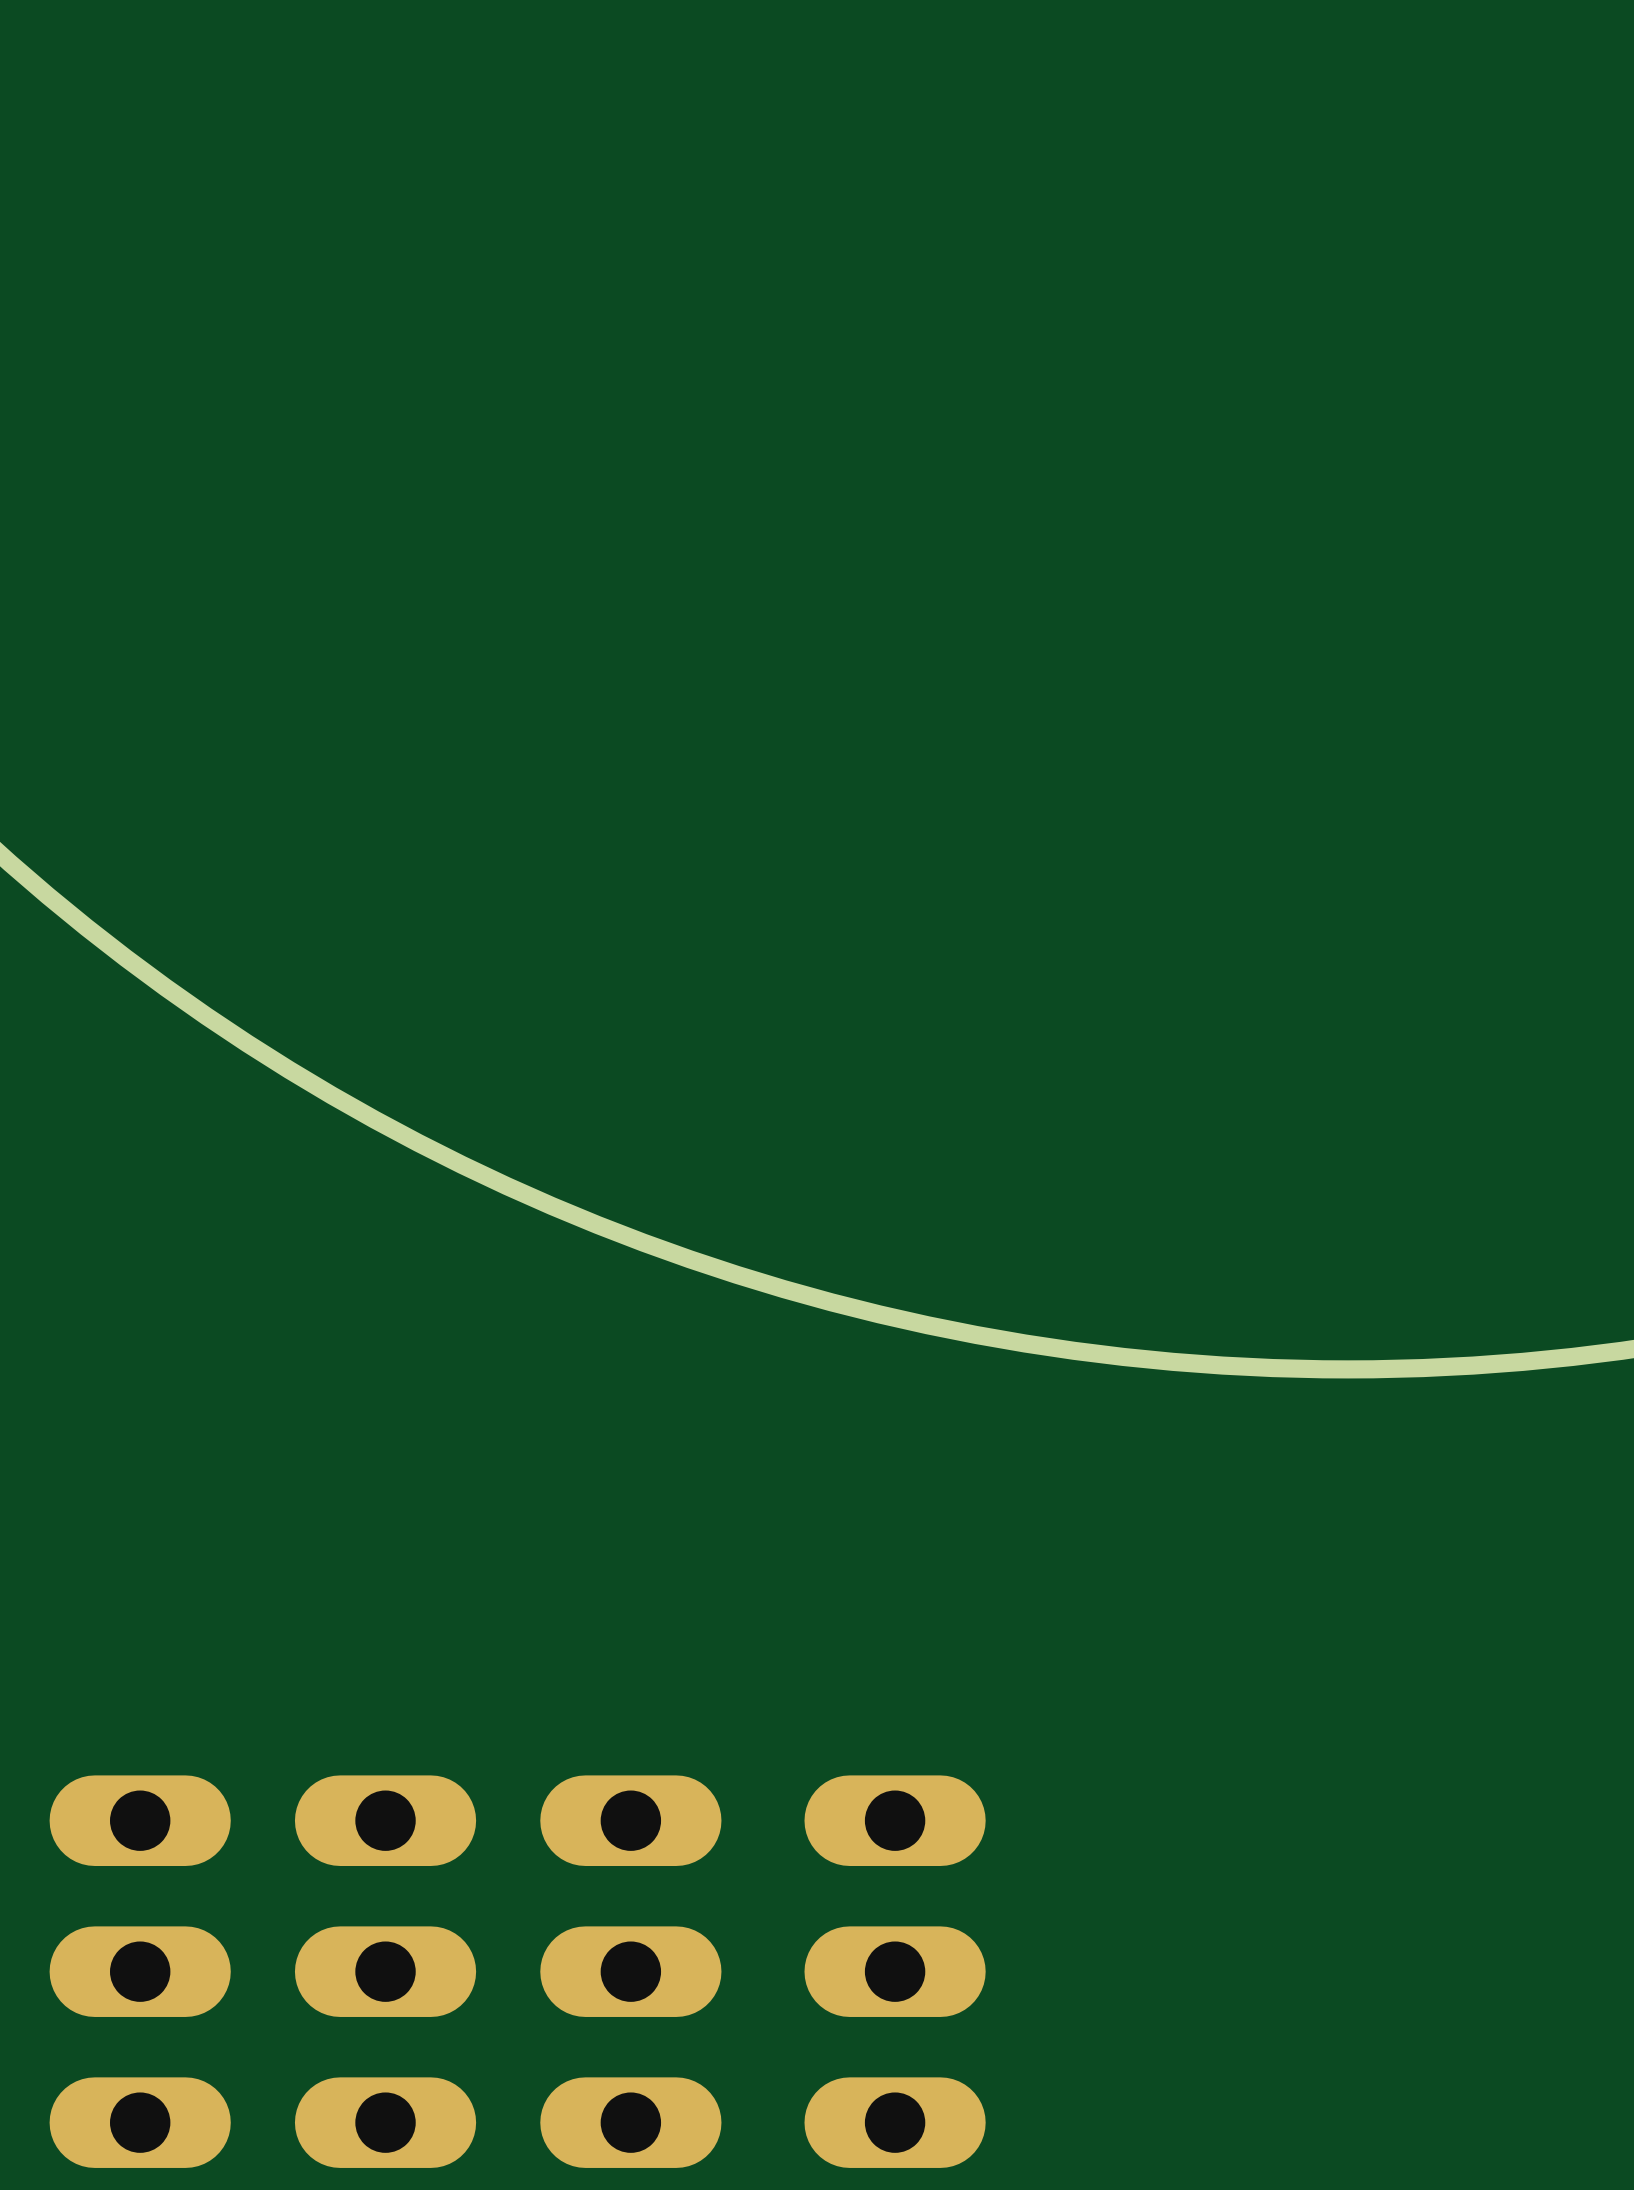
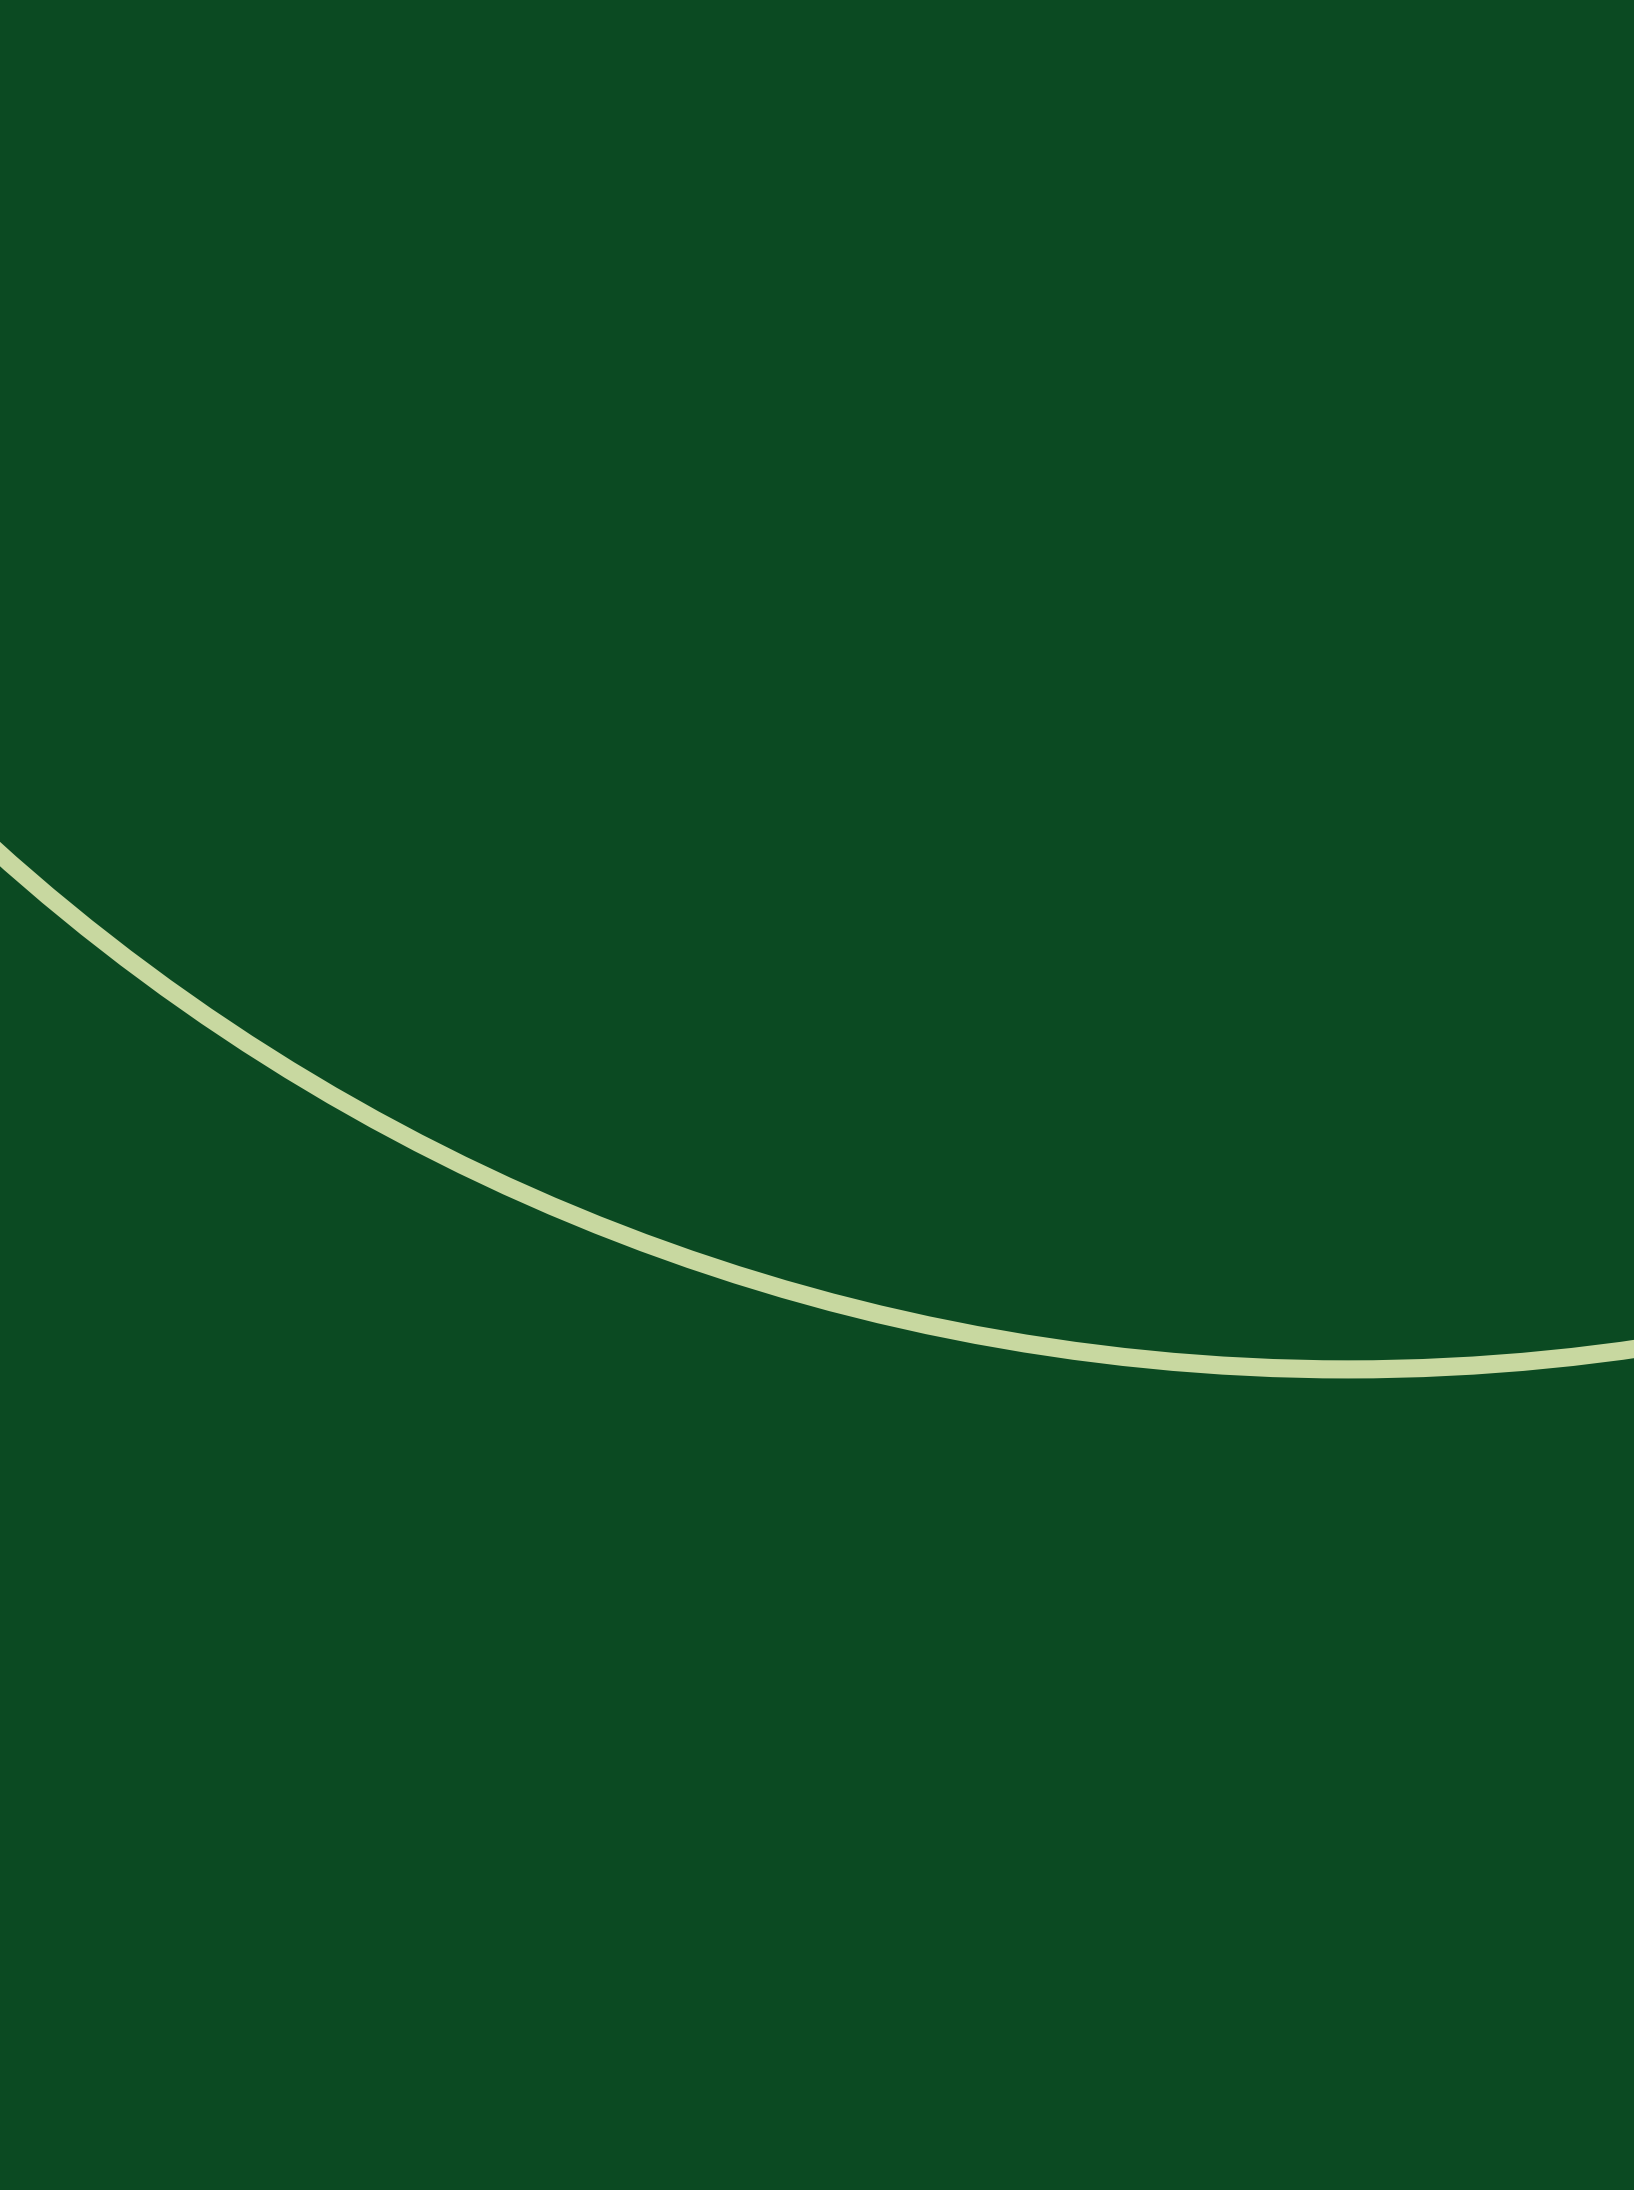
part: (140, 1971) -> none
part: (385, 1971) -> none
part: (630, 1971) -> none
part: (895, 1971) -> none

